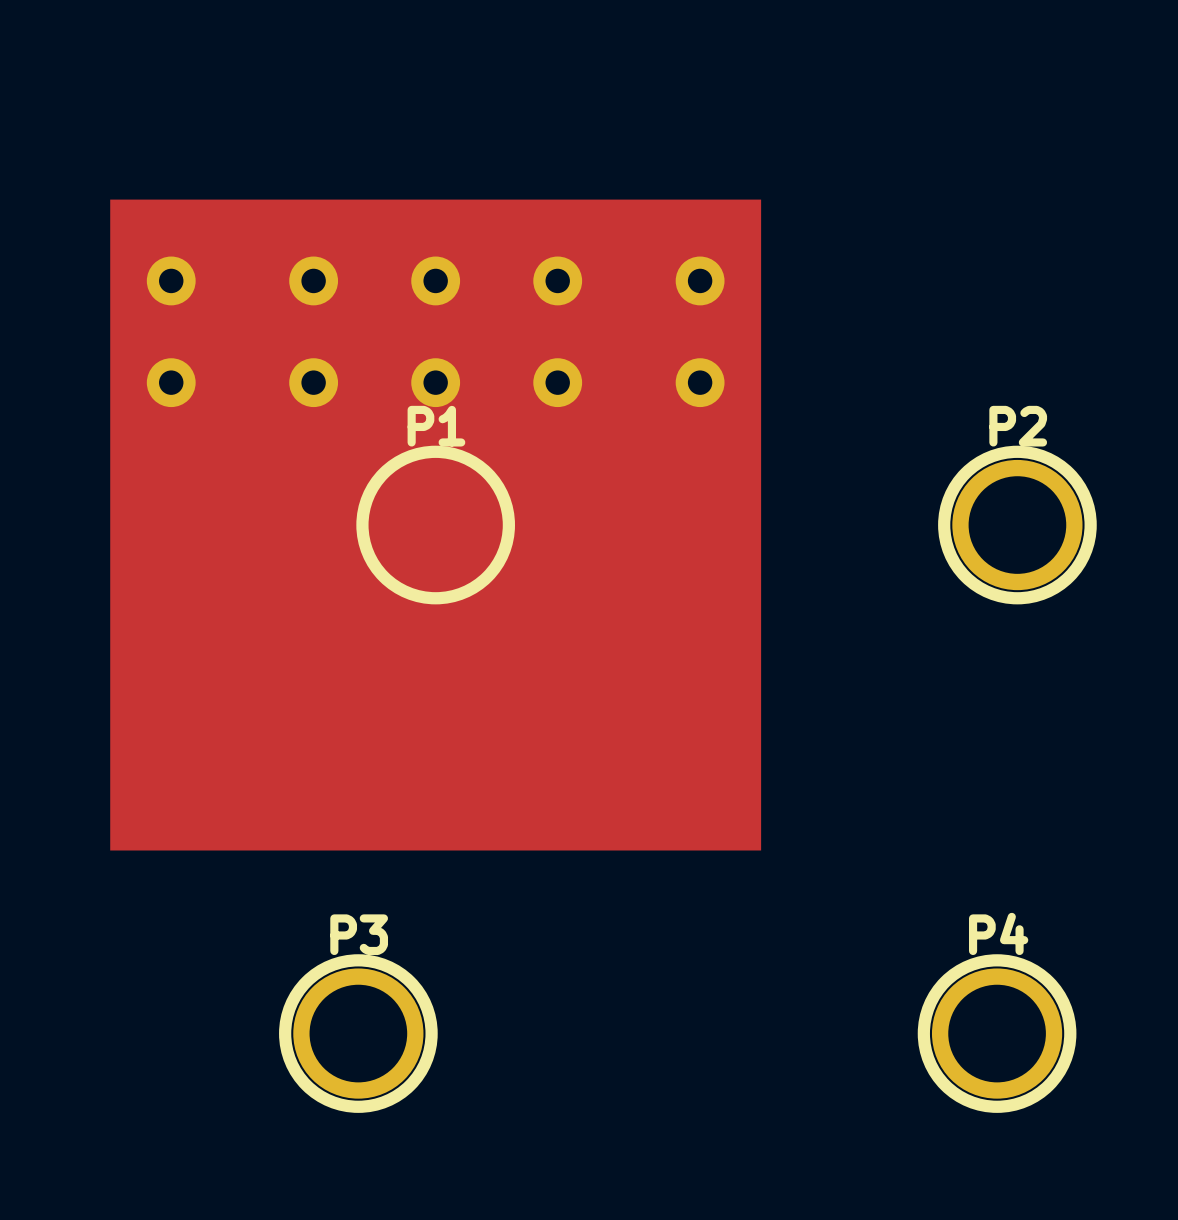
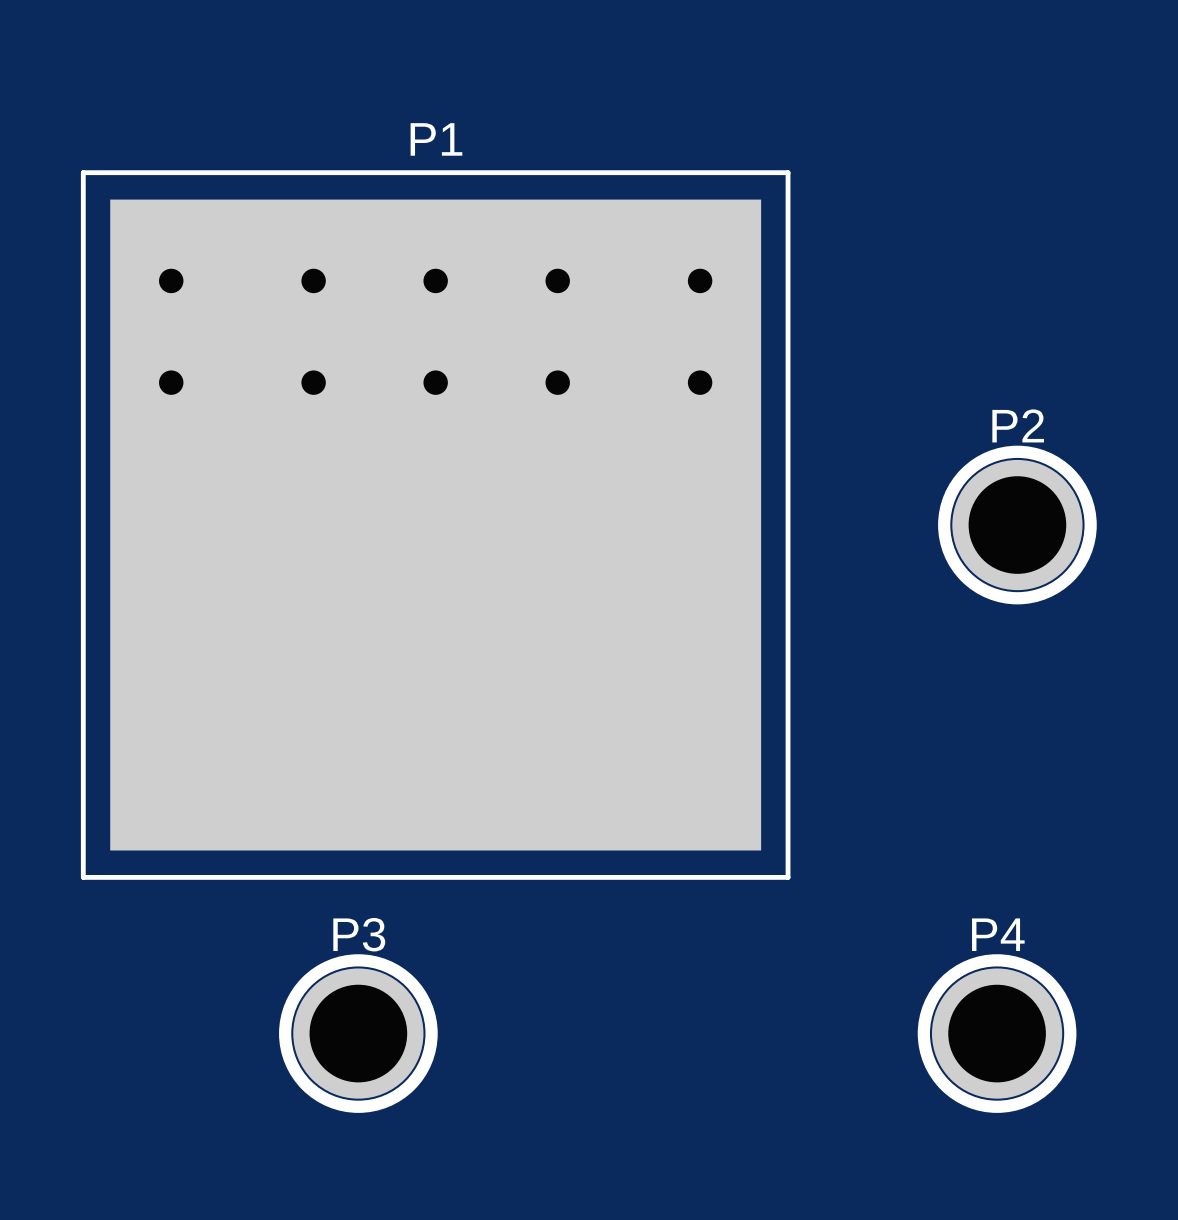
P1 footprint: [110, 199, 762, 851] -> [80, 170, 791, 880]
P1 name position: P1 (436, 426) -> P1 (436, 139)

